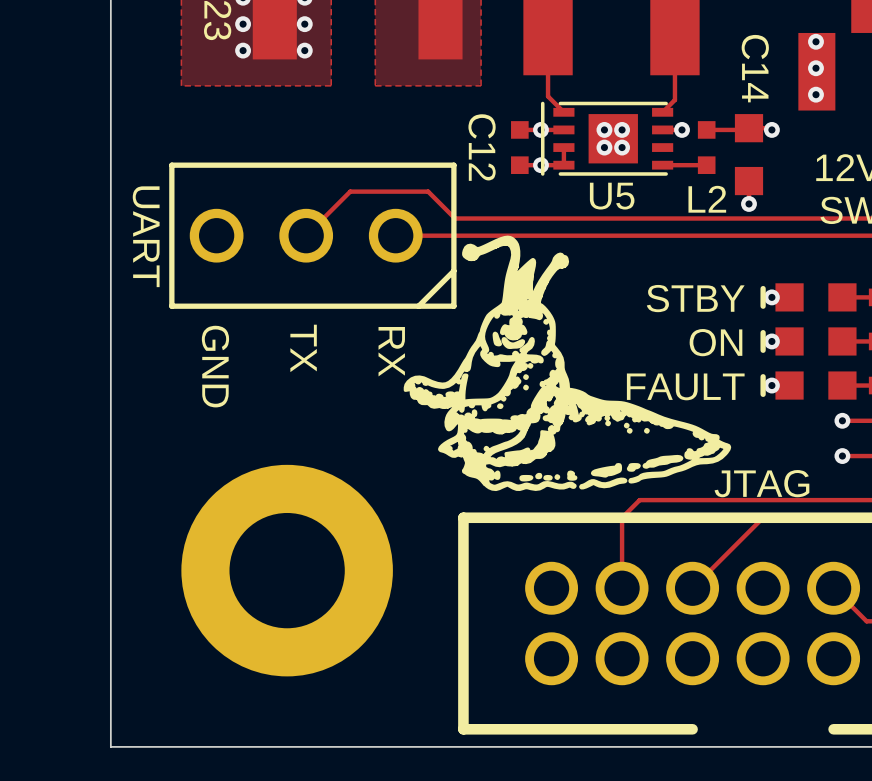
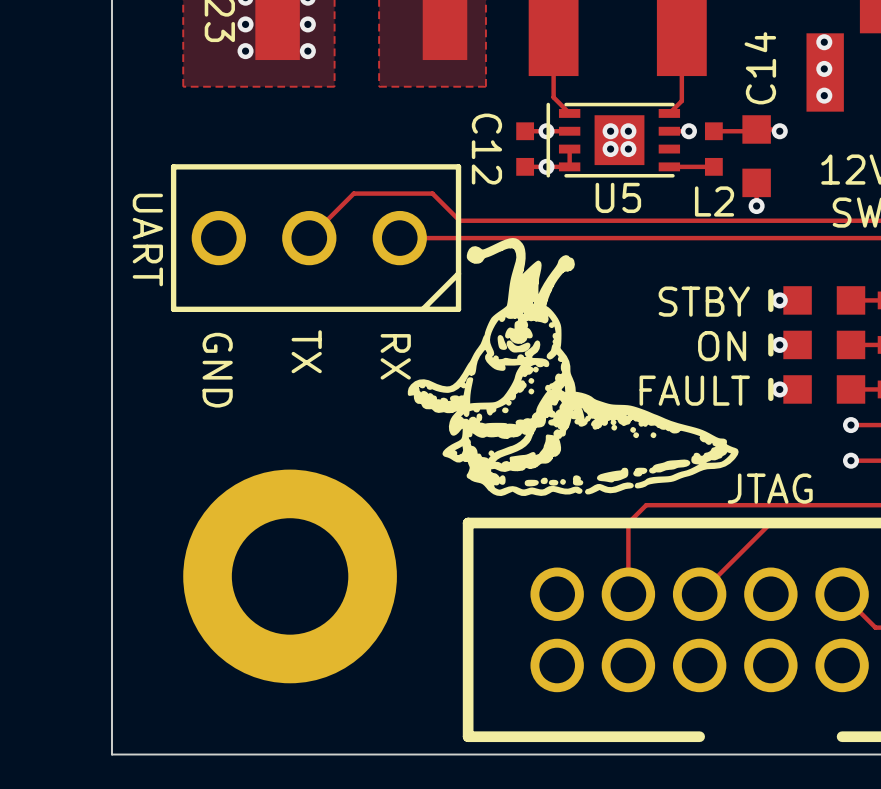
C14 name rotation: 0° (755, 68) -> 180° (760, 68)

